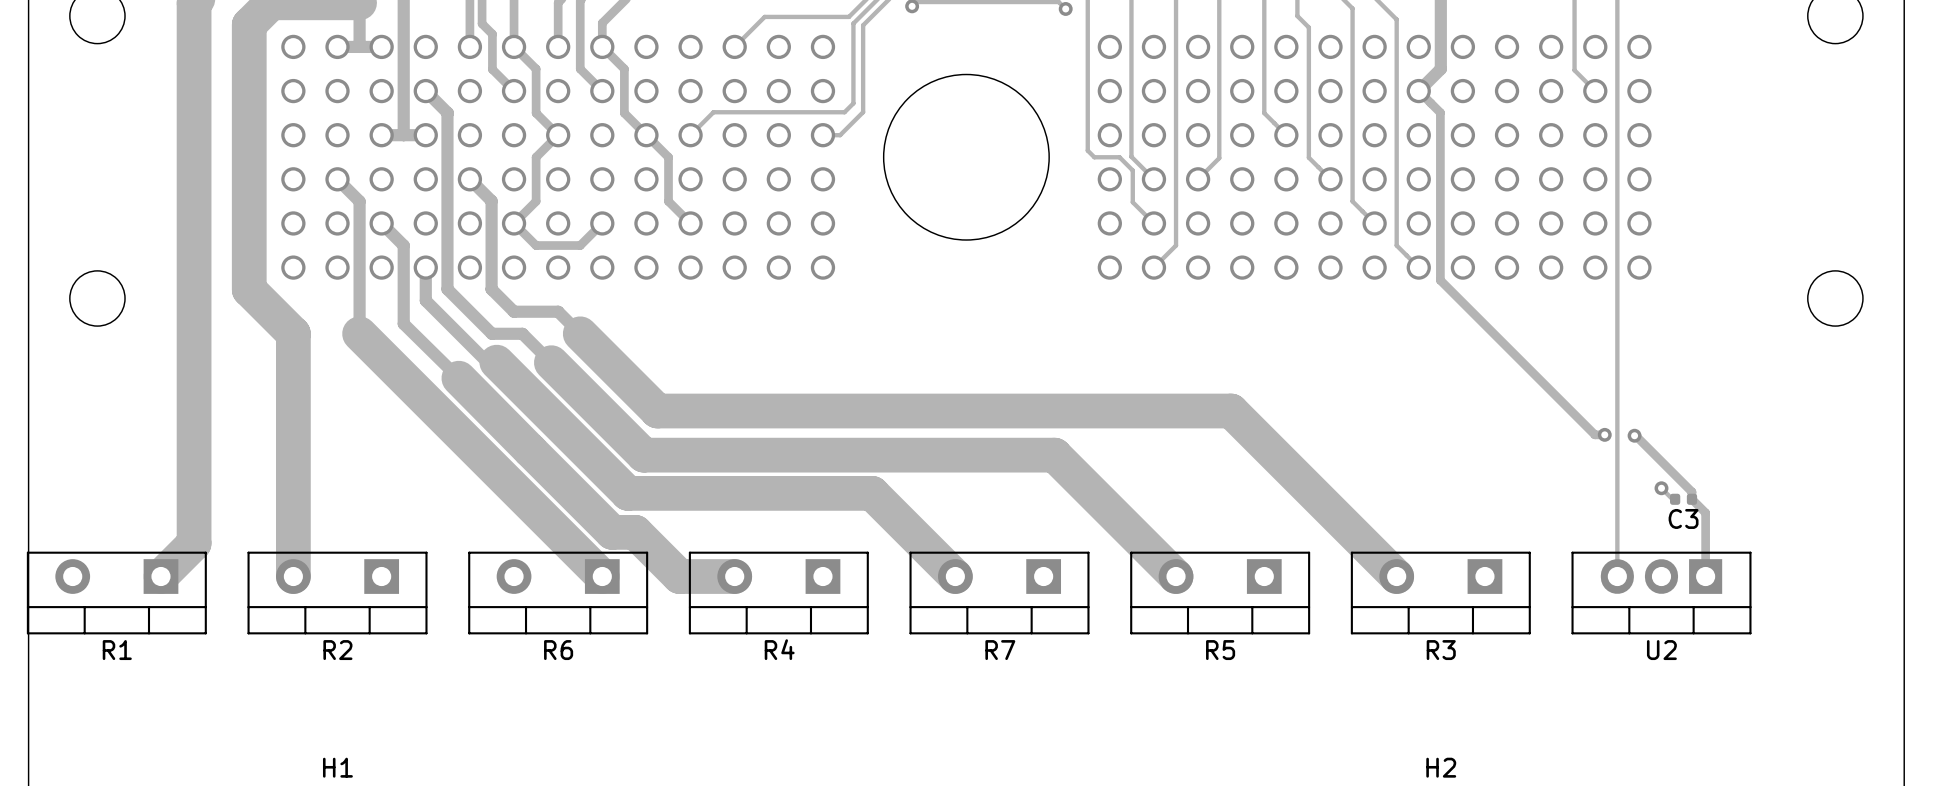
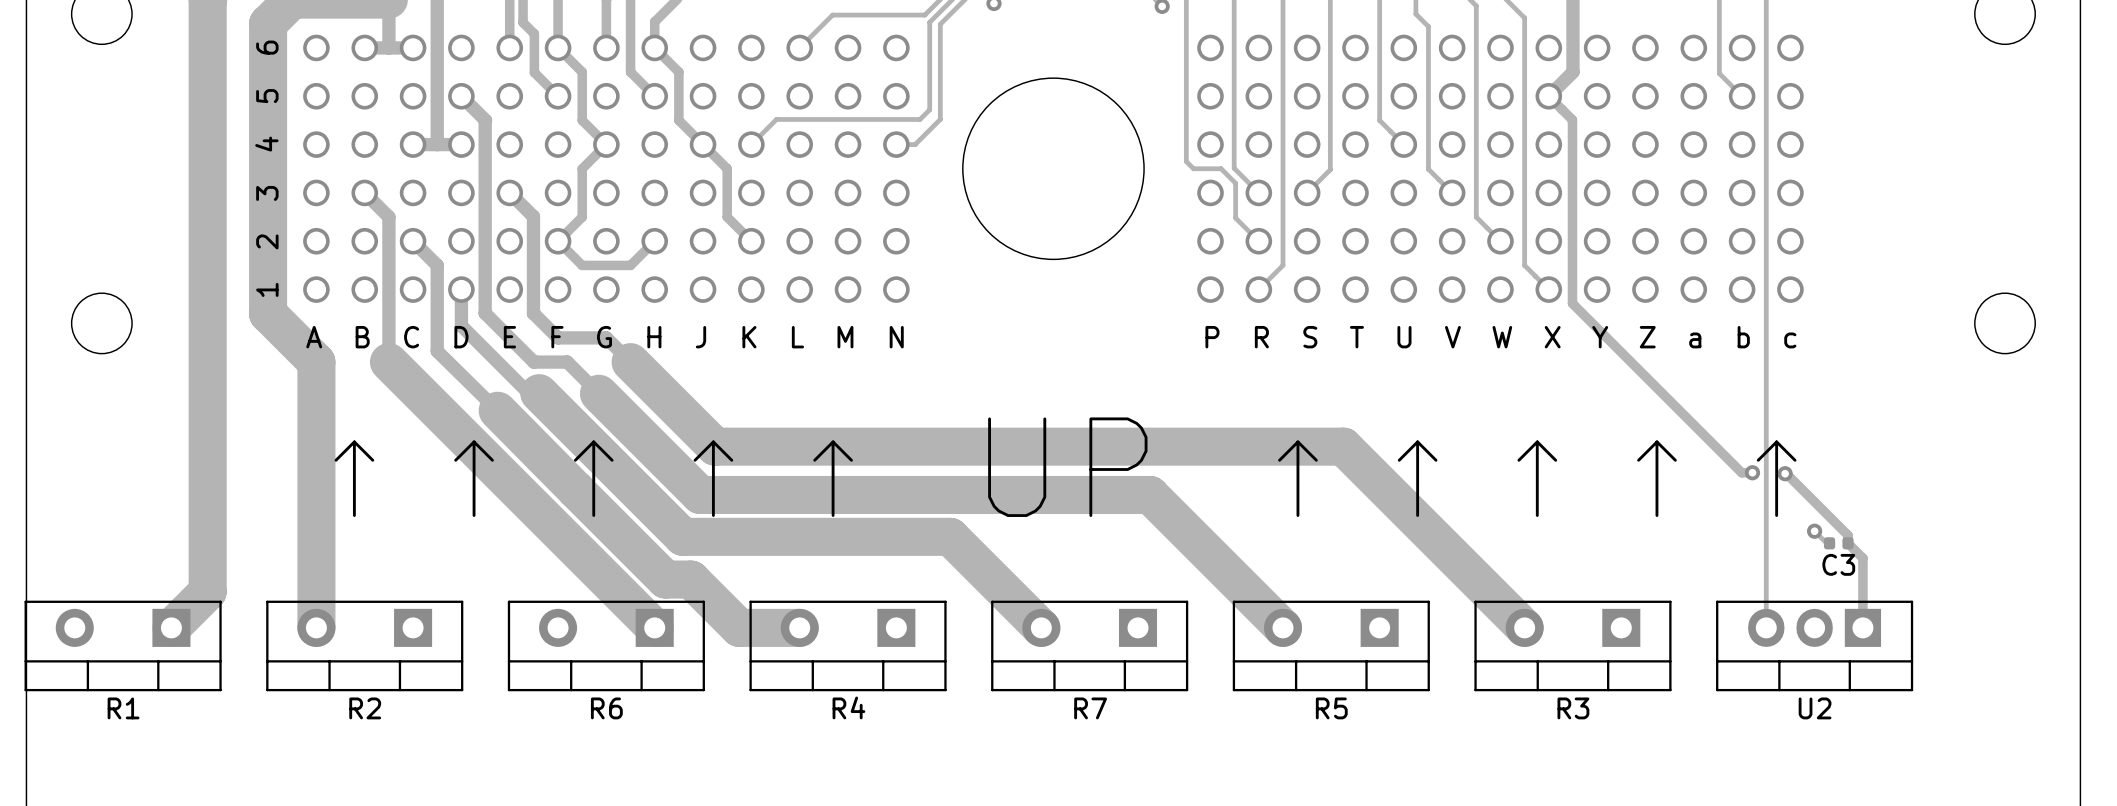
text: none -> 1 2 3 4 5 6 (266, 168)
text: none -> A B C D E F G H J K L M N (604, 337)
text: none -> P R S T U V W X Y Z a b c (1500, 337)
text: none -> ↑↑↑↑↑ UP ↑↑↑↑↑ (1065, 467)

